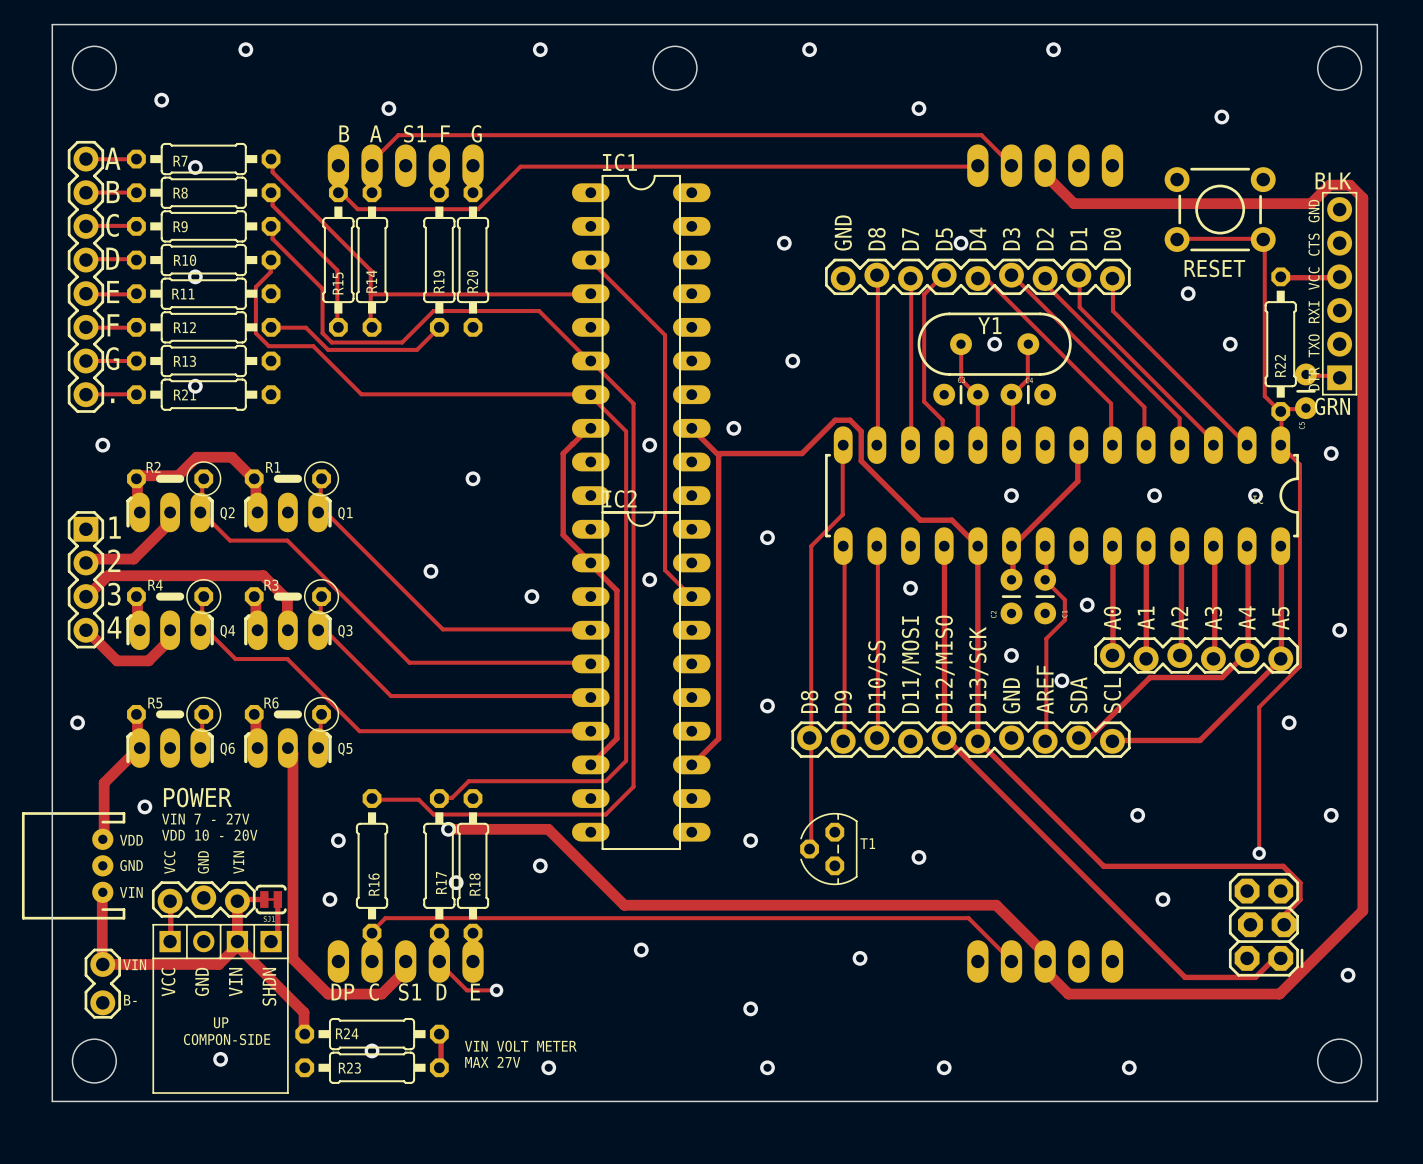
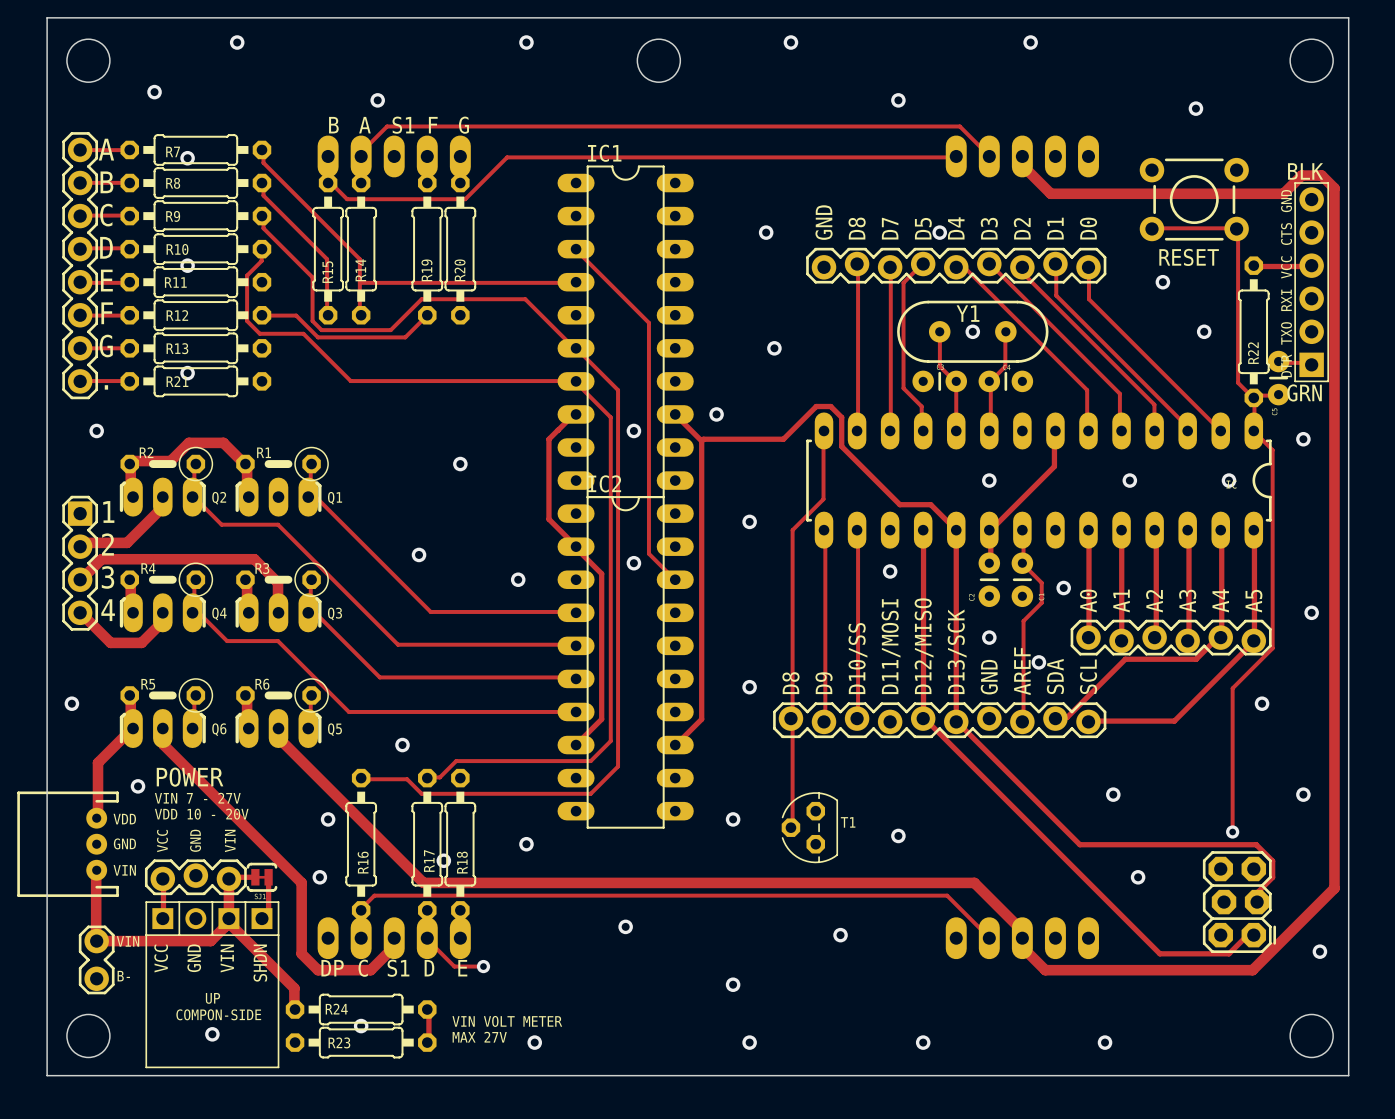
track: (289, 749) (292, 753) (292, 958) (311, 977) -> (162, 728) (163, 744) (301, 882) (301, 953)
track: (448, 829) (548, 829) (624, 905) -> (279, 730) (279, 739) (423, 882) (608, 882)
via position: (448, 829) -> (402, 745)

